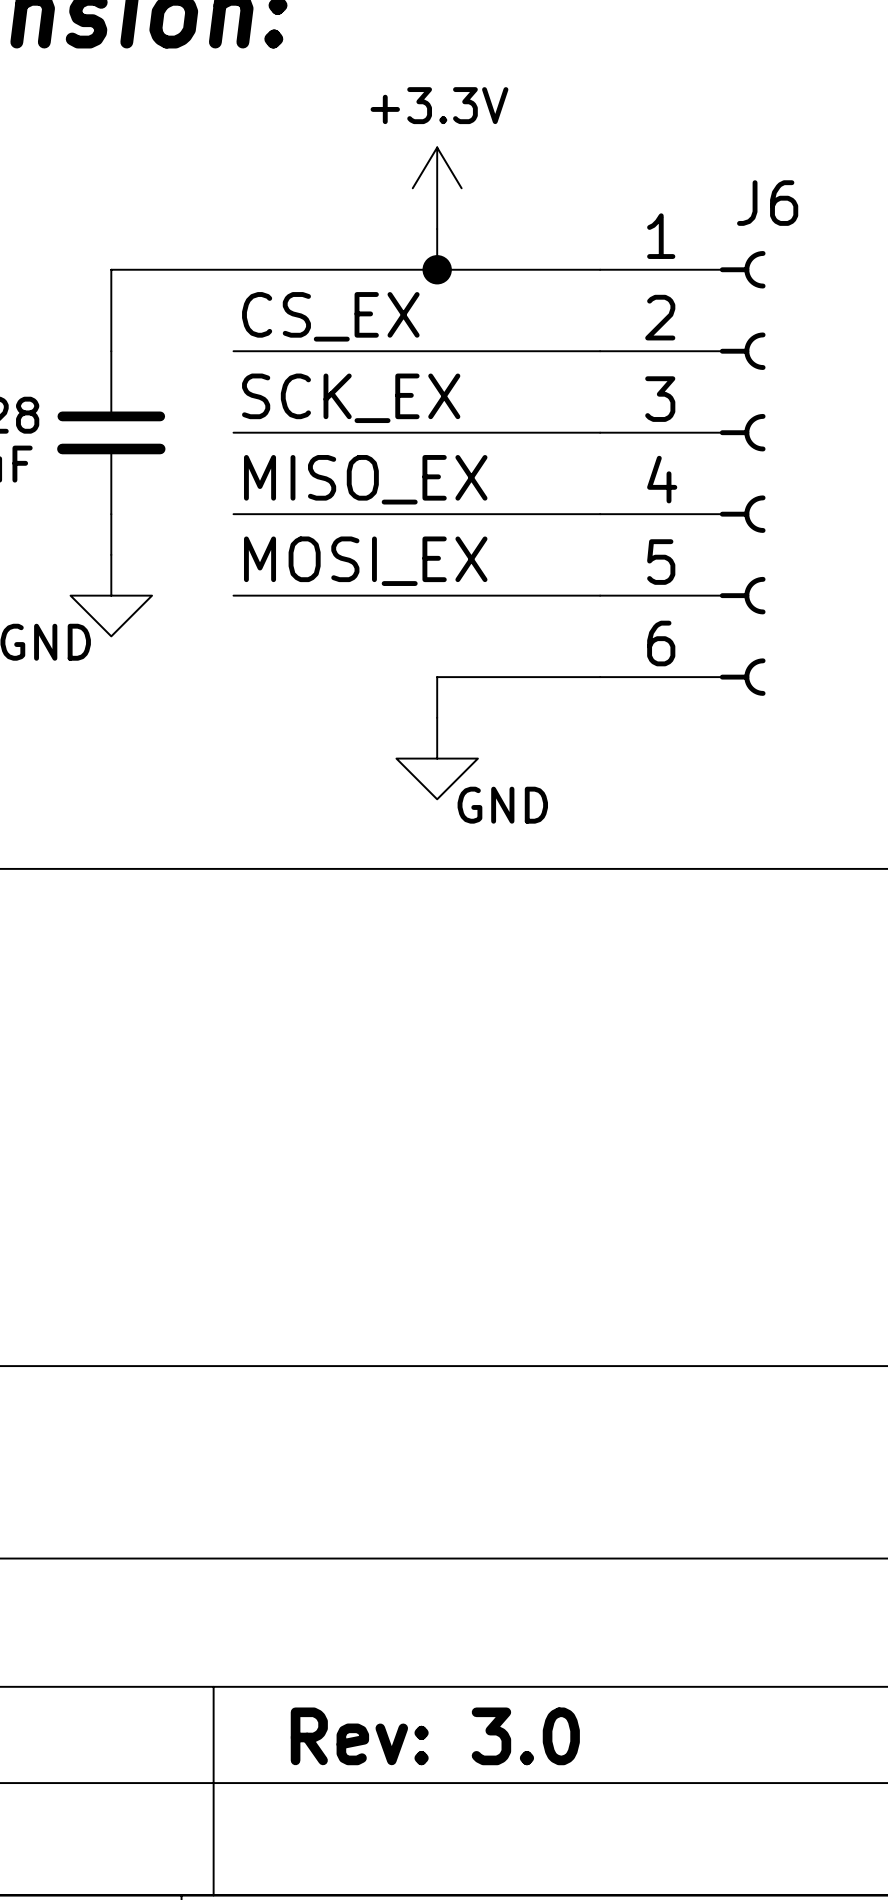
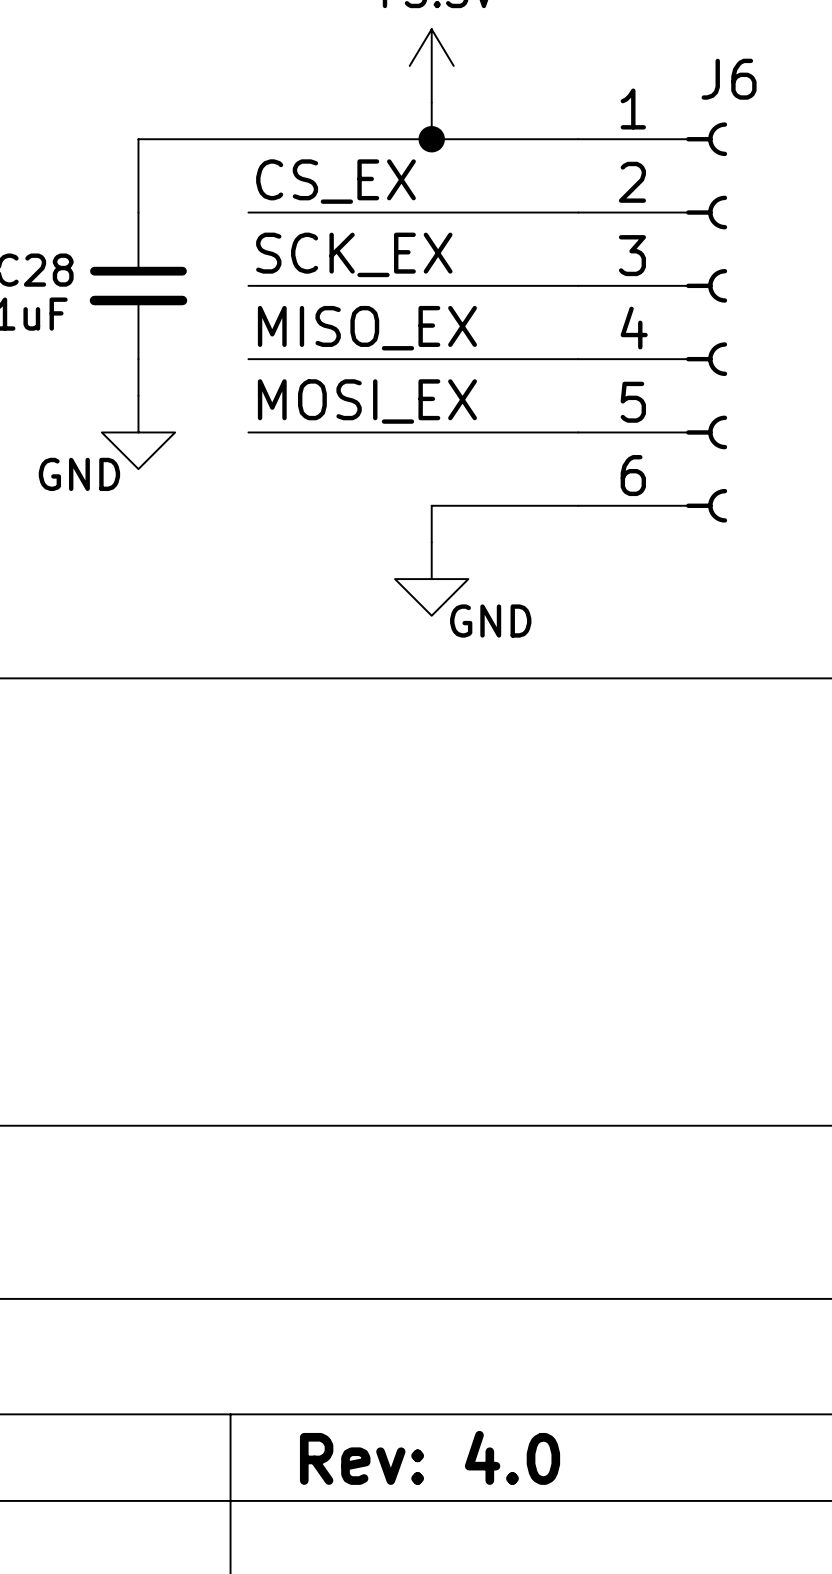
title block: Rev: 3.0 (435, 1736) -> Rev: 4.0 (430, 1457)

